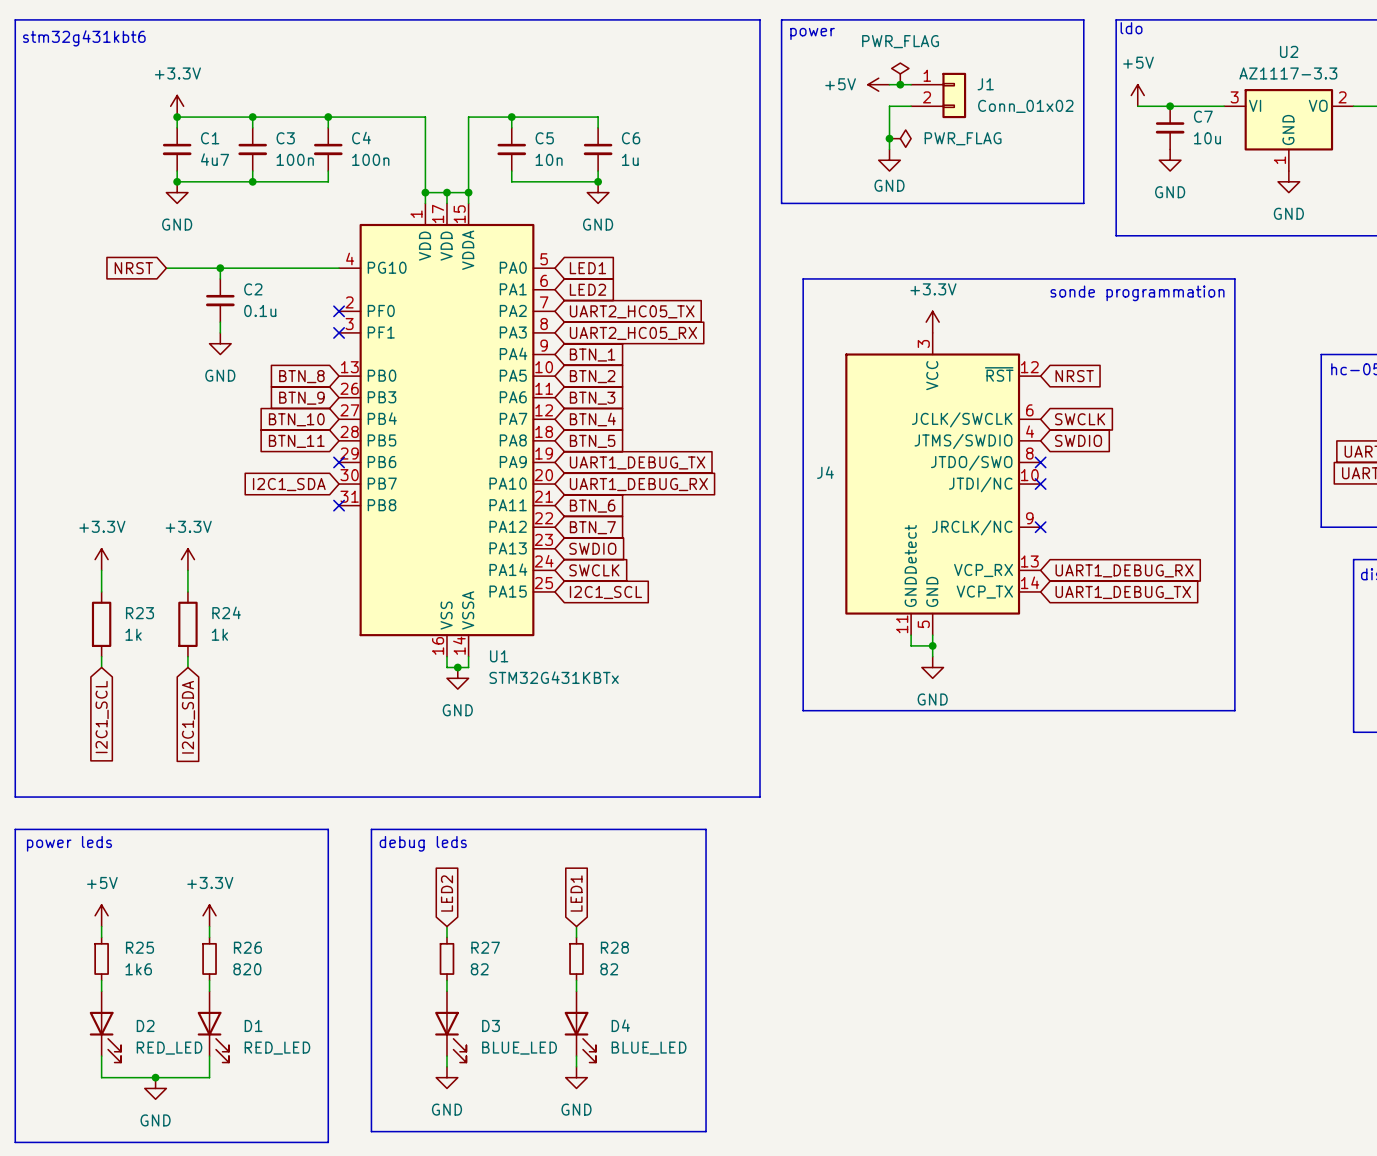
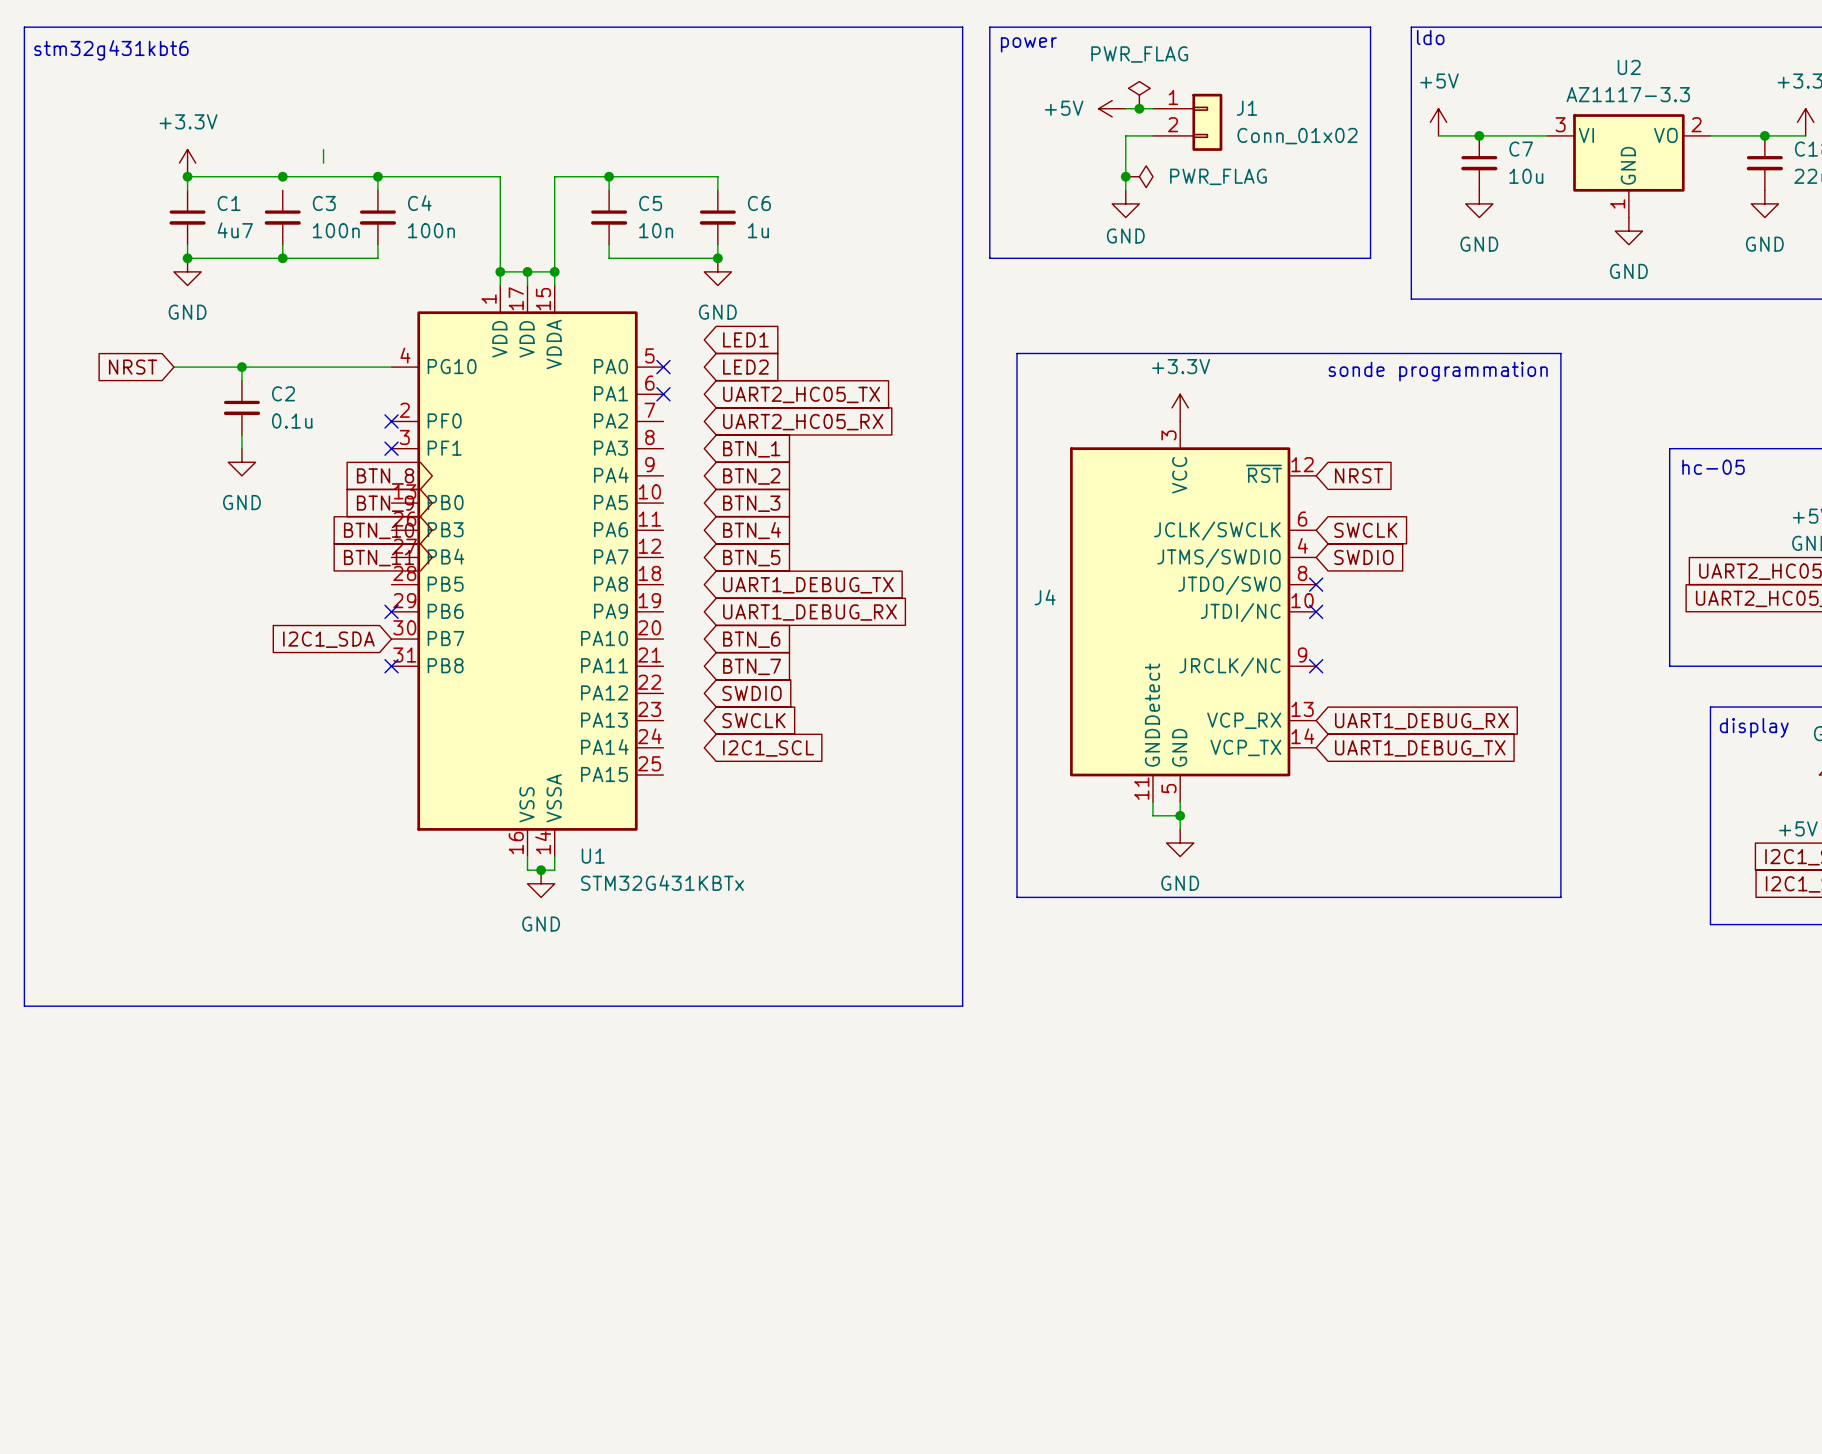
power symbol position: +3.3V (177, 106) -> +3.3V (187, 163)
junction: (177, 117) -> none
junction: (252, 117) -> none
wire: (328, 117) (328, 127) -> (377, 176) (377, 190)
junction: (328, 117) -> none
wire: (511, 117) (511, 127) -> (609, 176) (609, 190)
junction: (511, 117) -> none
wire: (177, 127) (177, 117) (425, 117) (425, 203) -> (187, 190) (187, 176) (500, 176) (500, 285)
wire: (598, 127) (598, 117) (468, 117) (468, 203) -> (717, 190) (717, 176) (554, 176) (554, 285)
junction: none -> (187, 176)
junction: none -> (282, 176)
junction: none -> (377, 176)
junction: none -> (609, 176)
C1 position: (177, 149) -> (187, 217)
C3 position: (252, 149) -> (282, 217)
C4 position: (328, 149) -> (377, 217)
C5 position: (511, 149) -> (609, 217)
C6 position: (598, 149) -> (717, 217)
wire: (177, 171) (177, 181) (328, 181) (328, 171) -> (187, 244) (187, 258) (377, 258) (377, 244)
wire: (252, 171) (252, 181) -> (282, 244) (282, 258)
wire: (511, 171) (511, 181) (598, 181) (598, 171) -> (609, 244) (609, 258) (717, 258) (717, 244)
junction: (177, 181) -> none
junction: (252, 181) -> none
junction position: (598, 181) -> (717, 258)
power symbol position: GND (177, 192) -> GND (187, 271)
wire: (425, 192) (468, 192) -> (500, 271) (554, 271)
junction: (425, 192) -> none
wire: (446, 192) (446, 203) -> (527, 271) (527, 285)
junction: (446, 192) -> none
junction: (468, 192) -> none
power symbol position: GND (598, 192) -> GND (717, 271)
junction: none -> (187, 258)
junction: none -> (282, 258)
junction: none -> (500, 271)
junction: none -> (527, 271)
junction: none -> (554, 271)
global label position: NRST (133, 268) -> NRST (133, 367)
wire: (166, 268) (339, 268) -> (173, 367) (391, 367)
wire: (220, 268) (220, 278) -> (241, 367) (241, 380)
junction: (220, 268) -> none
junction: none -> (241, 367)
no-connect mark: none -> (663, 367)
C2 position: (220, 300) -> (241, 407)
no-connect mark: (339, 311) -> none
no-connect mark: none -> (663, 394)
wire: (220, 322) (220, 332) -> (241, 435) (241, 448)
no-connect mark: none -> (391, 421)
no-connect mark: (339, 332) -> none
power symbol position: GND (220, 343) -> GND (241, 462)
no-connect mark: none -> (391, 448)
U1 position: (446, 430) -> (527, 571)
no-connect mark: (339, 462) -> none
global label position: I2C1_SDA (289, 484) -> I2C1_SDA (328, 639)
no-connect mark: none -> (391, 611)
no-connect mark: (339, 505) -> none
no-connect mark: none -> (391, 666)
power symbol: +3.3V (101, 559) -> none
power symbol: +3.3V (187, 559) -> none
wire: (101, 570) (101, 591) -> none
wire: (187, 570) (187, 591) -> none
R23: 1k (101, 624) -> none
R24: 1k (187, 624) -> none
wire: (101, 656) (101, 667) -> none
wire: (187, 656) (187, 667) -> none
wire: (446, 656) (446, 667) (468, 667) (468, 656) -> (527, 856) (527, 870) (554, 870) (554, 856)
junction position: (457, 667) -> (541, 870)
power symbol position: GND (457, 678) -> GND (541, 883)
global label: I2C1_SCL (102, 717) -> none
global label: I2C1_SDA (188, 717) -> none
line: (15, 829) (328, 829) (328, 1142) (15, 1142) (15, 829) -> none
line: (371, 829) (706, 829) (706, 1131) (371, 1131) (371, 829) -> none
text: power leds (69, 843) -> none
text: debug leds (423, 843) -> none
global label: LED2 (446, 893) -> none
global label: LED1 (576, 893) -> none
power symbol: +5V (101, 915) -> none
power symbol: +3.3V (209, 915) -> none
wire: (101, 926) (101, 937) -> none
wire: (209, 926) (209, 937) -> none
wire: (446, 926) (446, 937) -> none
wire: (576, 926) (576, 937) -> none
R25: 1k6 (101, 958) -> none
R26: 820 (209, 958) -> none
R27: 82 (446, 958) -> none
R28: 82 (576, 958) -> none
wire: (101, 980) (101, 991) -> none
wire: (209, 980) (209, 991) -> none
wire: (446, 980) (446, 991) -> none
wire: (576, 980) (576, 991) -> none
D2: RED_LED (105, 1026) -> none
D1: RED_LED (213, 1026) -> none
D3: BLUE_LED (450, 1026) -> none
D4: BLUE_LED (580, 1026) -> none
wire: (101, 1056) (101, 1077) (209, 1077) (209, 1056) -> none
wire: (446, 1056) (446, 1066) -> none
wire: (576, 1056) (576, 1066) -> none
junction: (155, 1077) -> none
power symbol: GND (446, 1077) -> none
power symbol: GND (576, 1077) -> none
power symbol: GND (155, 1088) -> none

